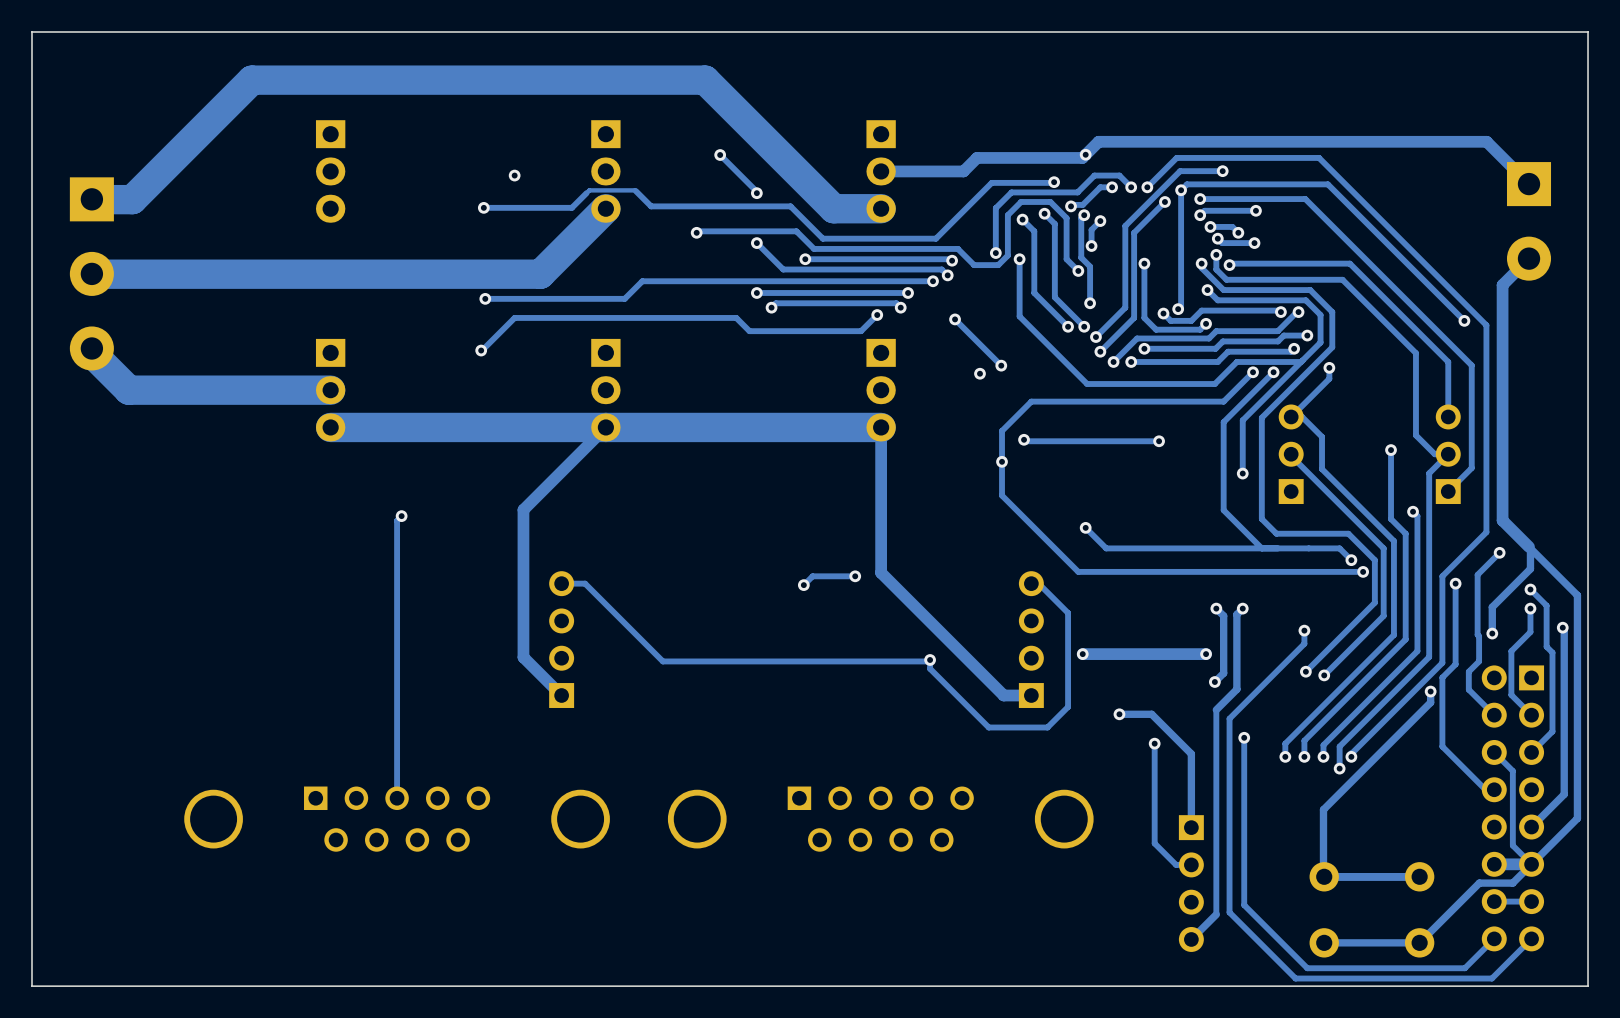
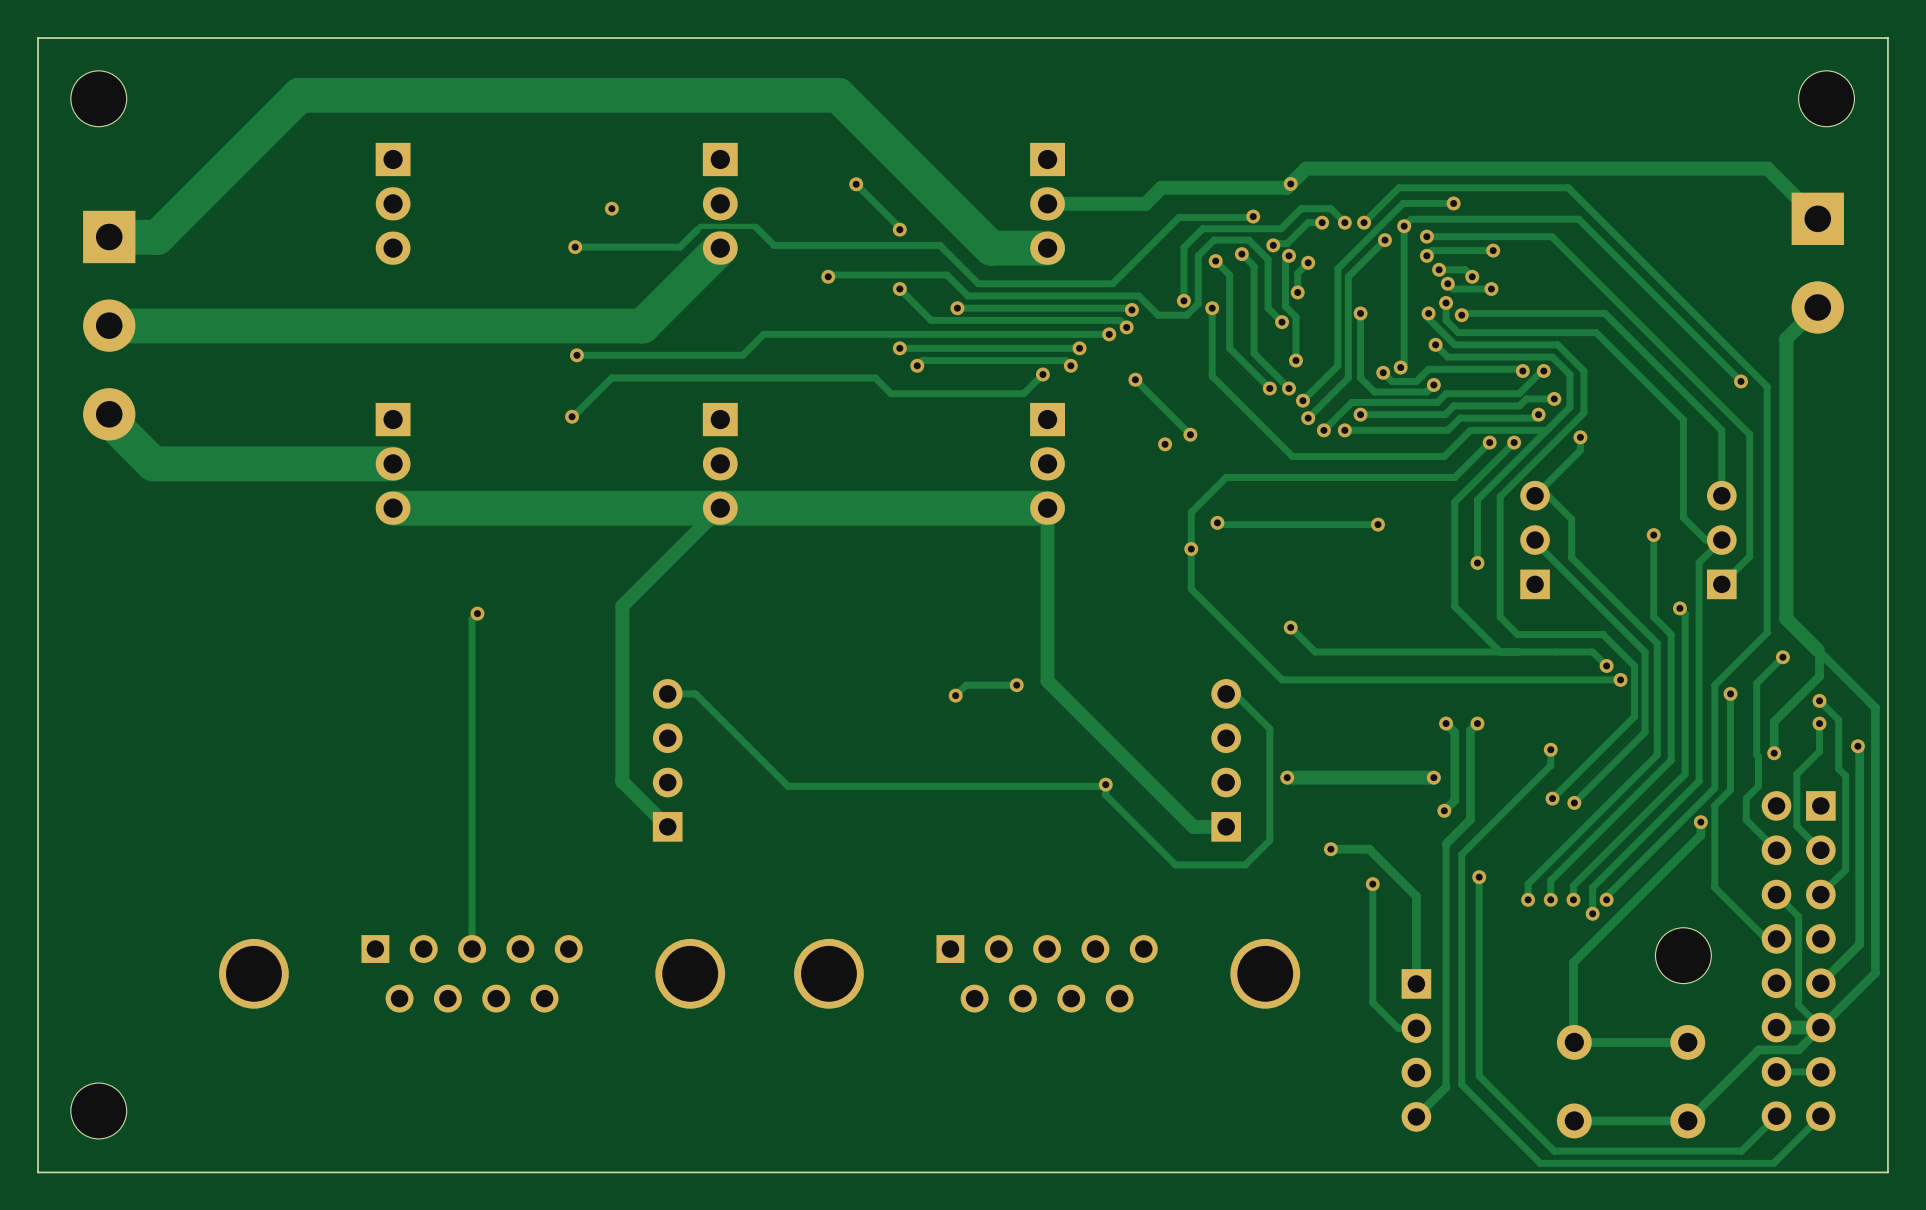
part: none -> (98, 98)
part: none -> (1826, 98)
part: none -> (1683, 955)
part: none -> (98, 1110)

